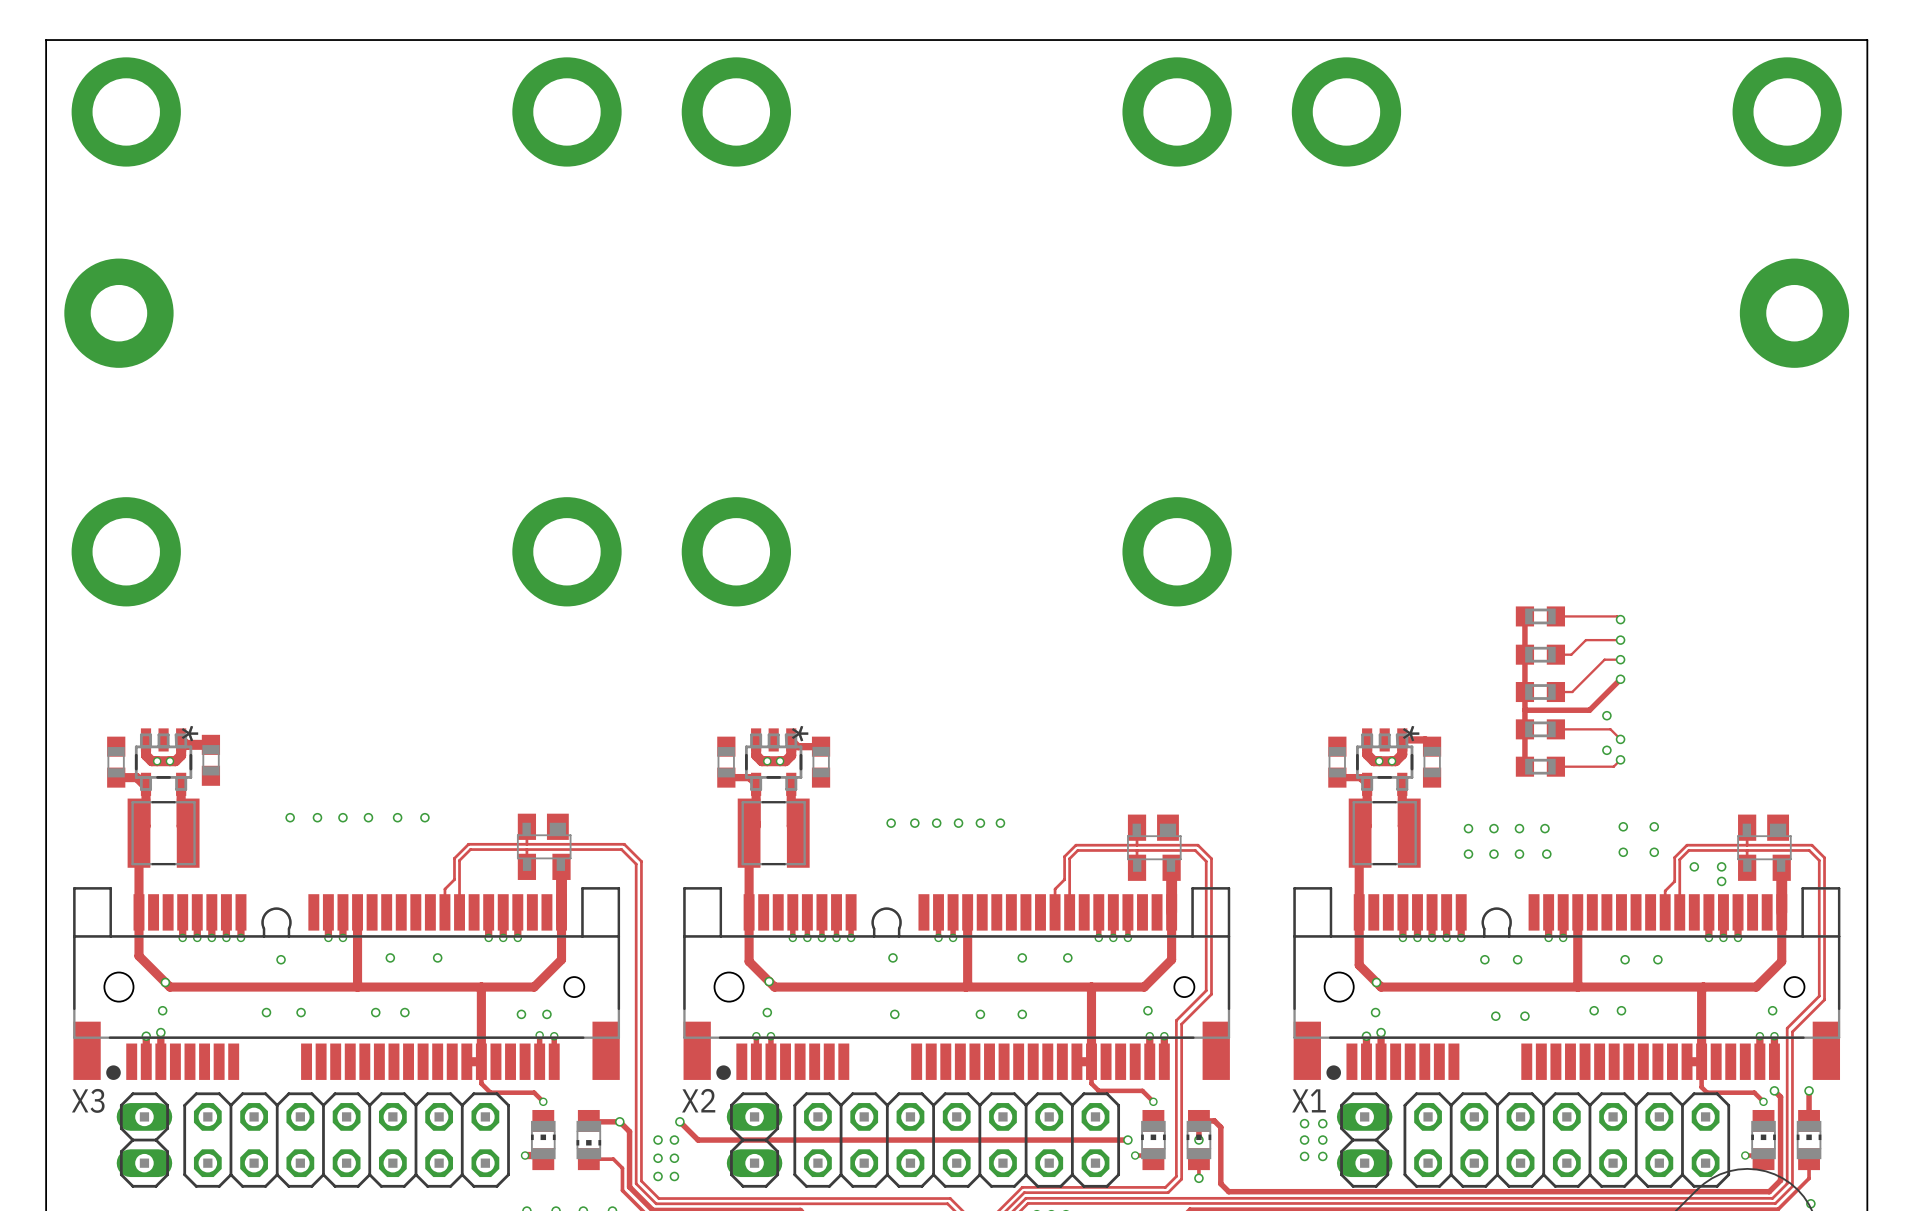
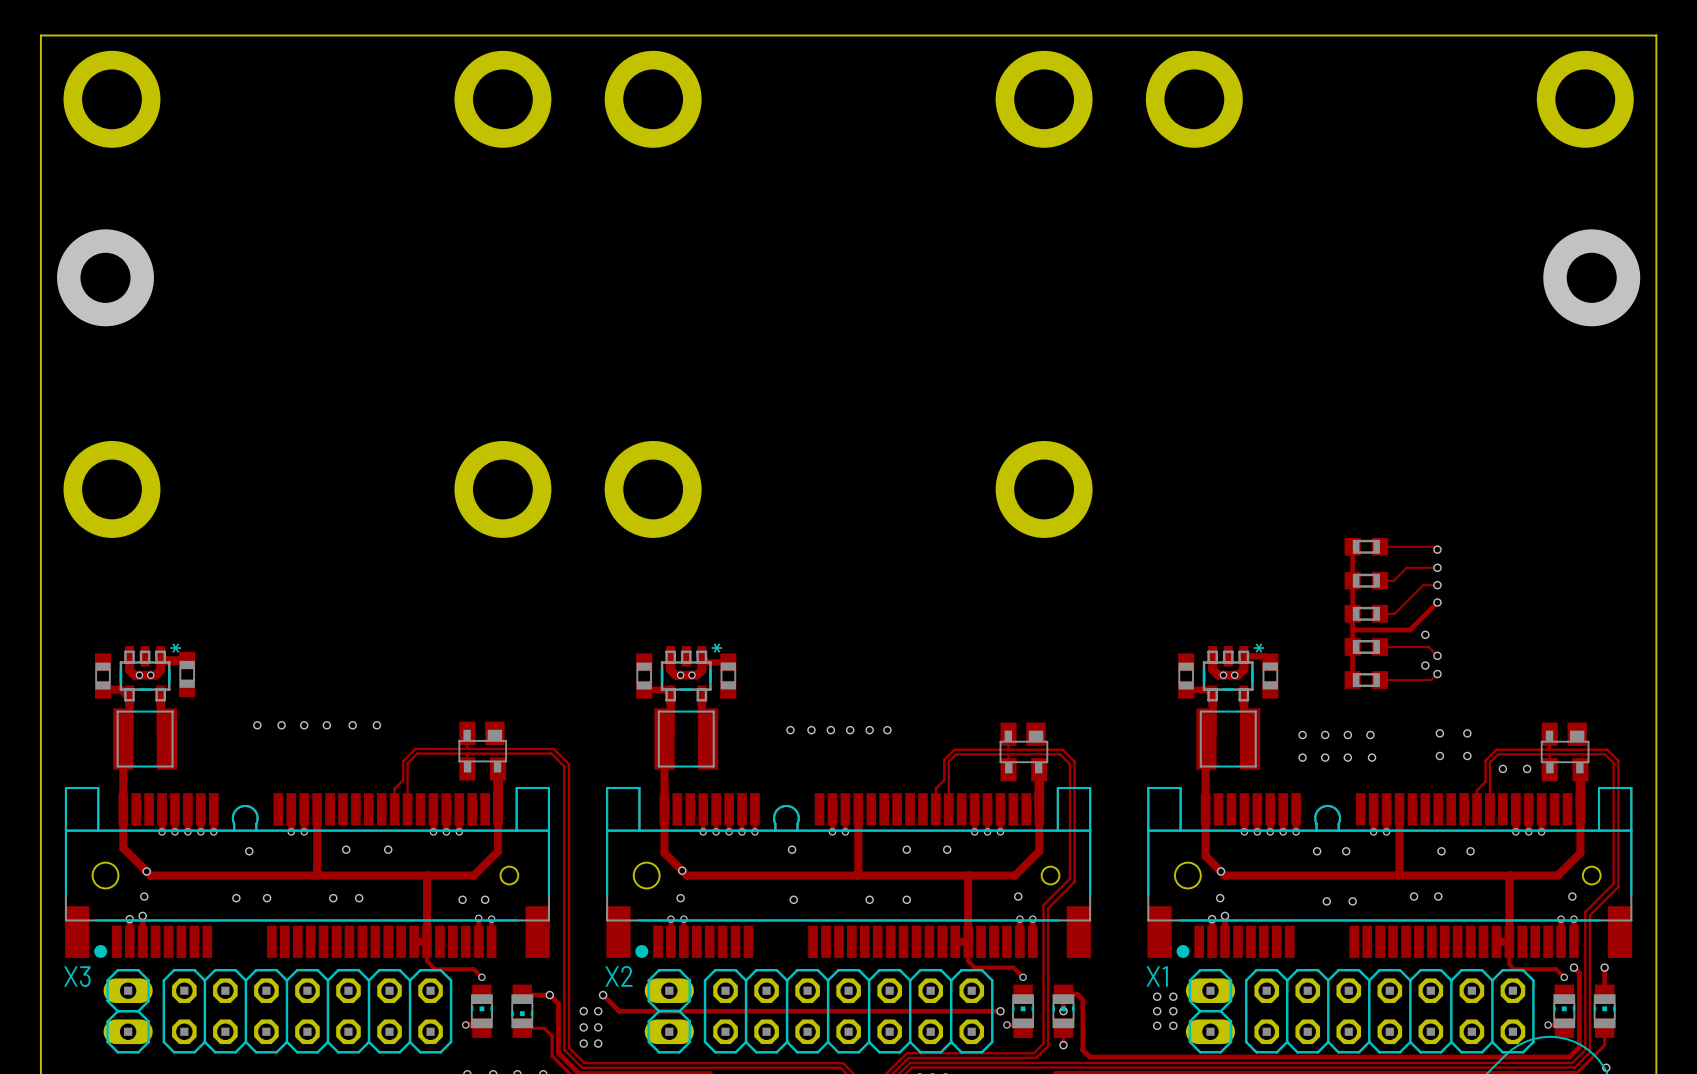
via: (1721, 881) -> none

